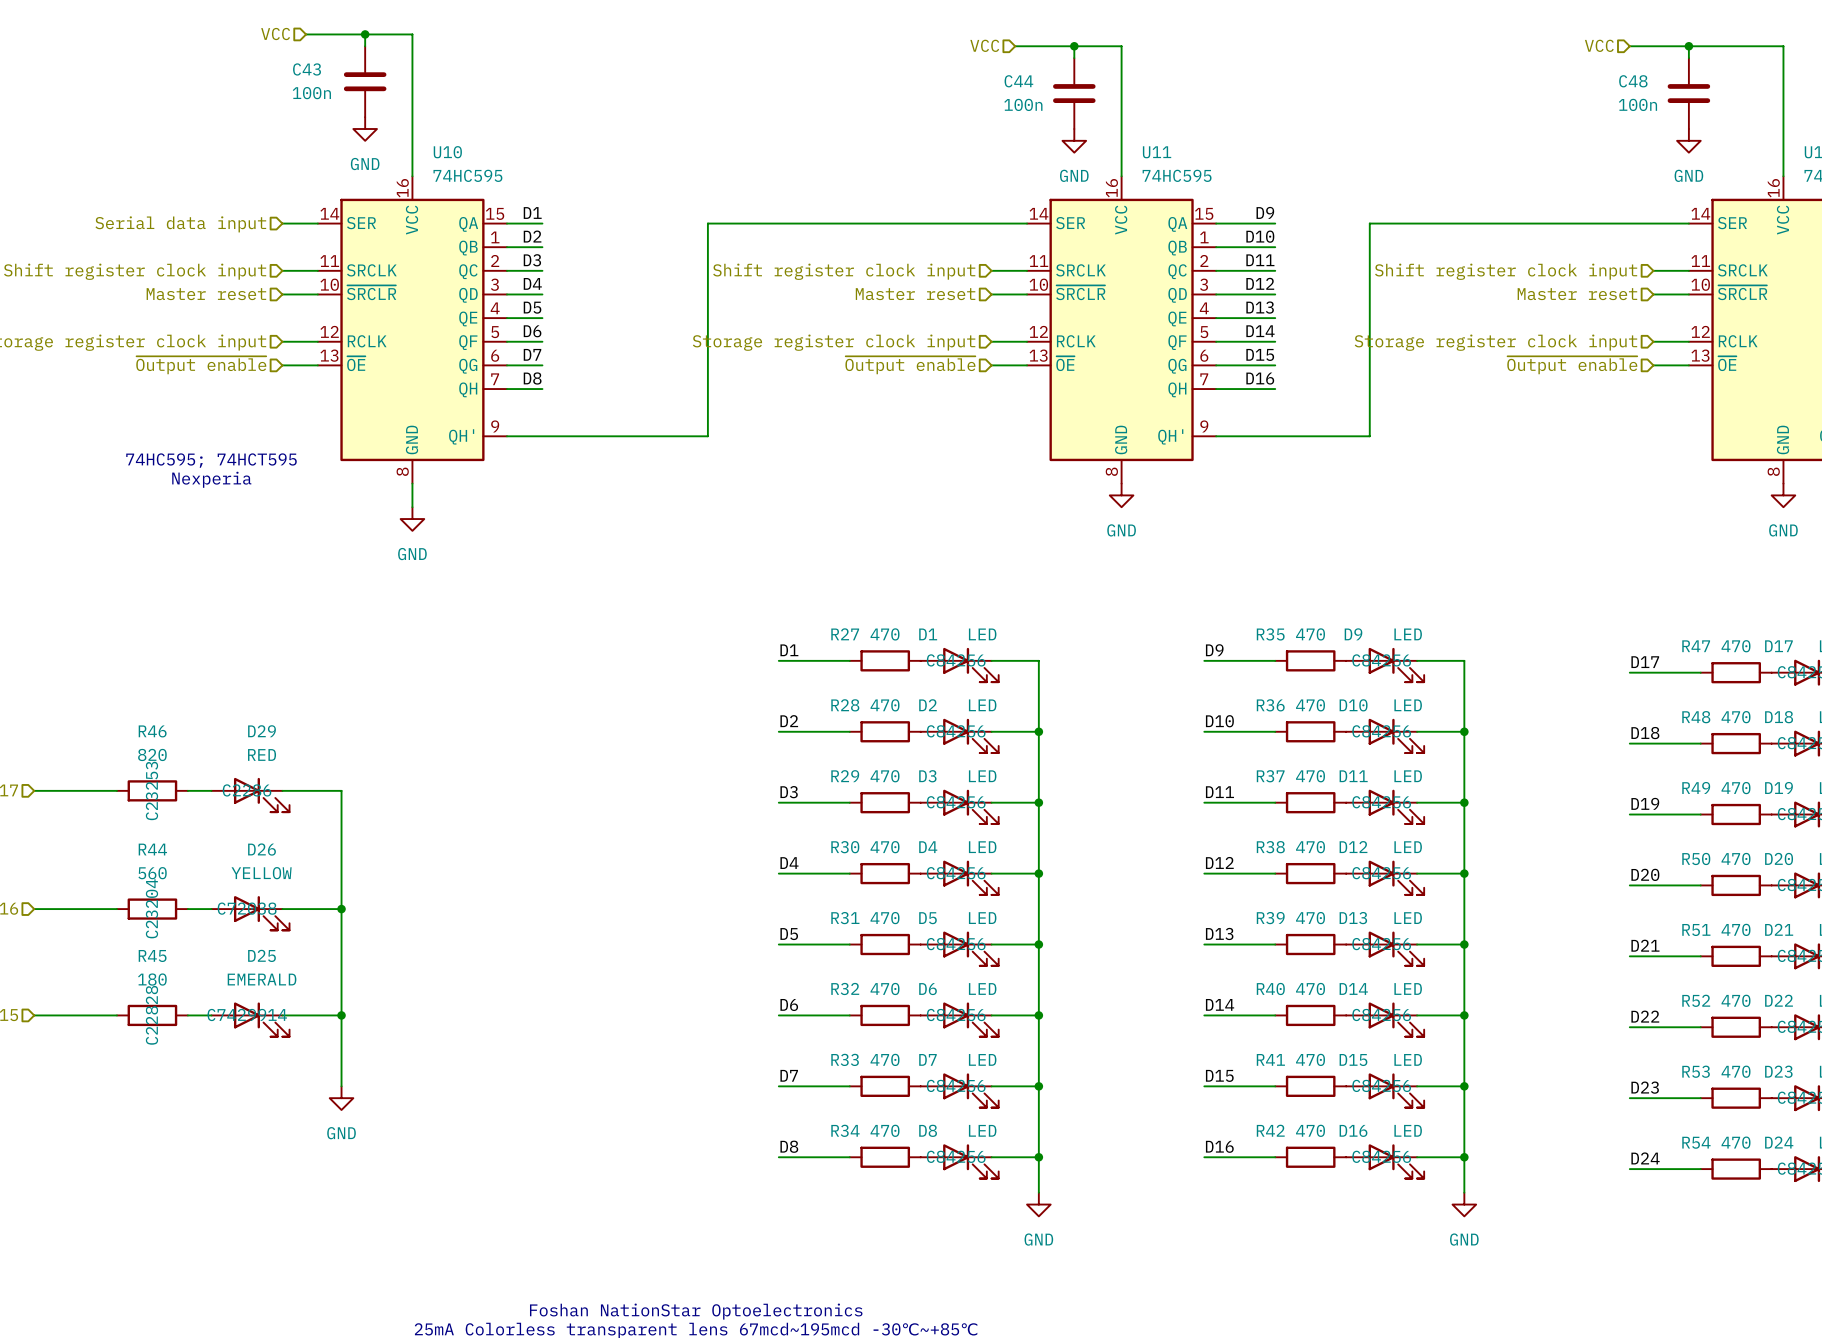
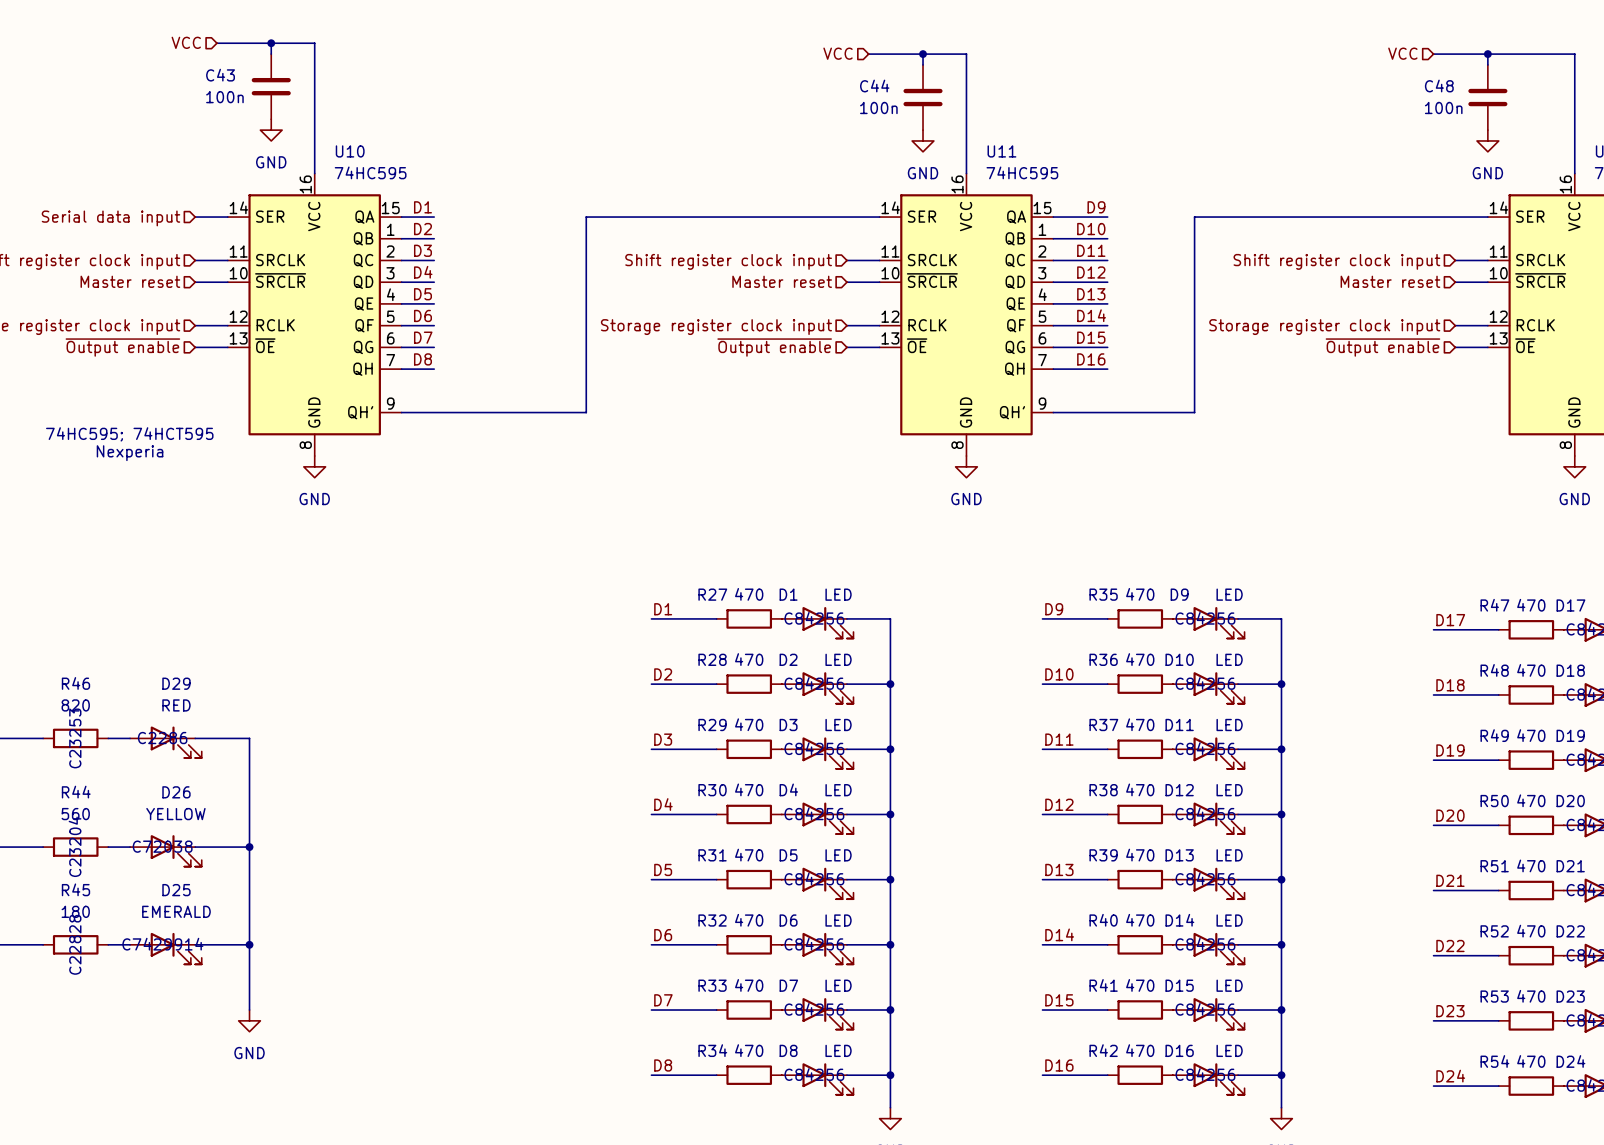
power symbol position: GND (412, 519) -> GND (314, 466)

